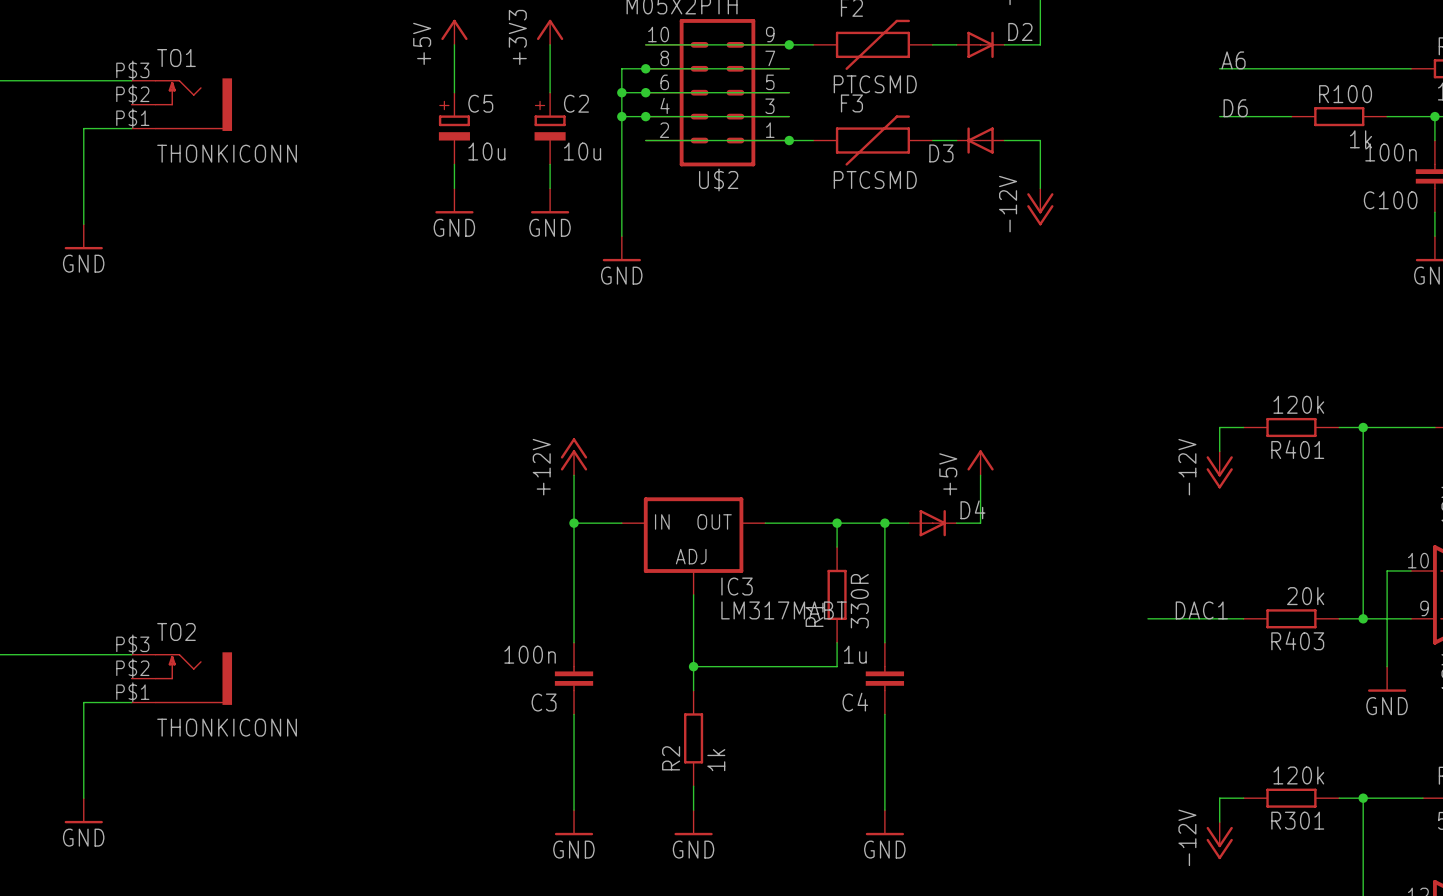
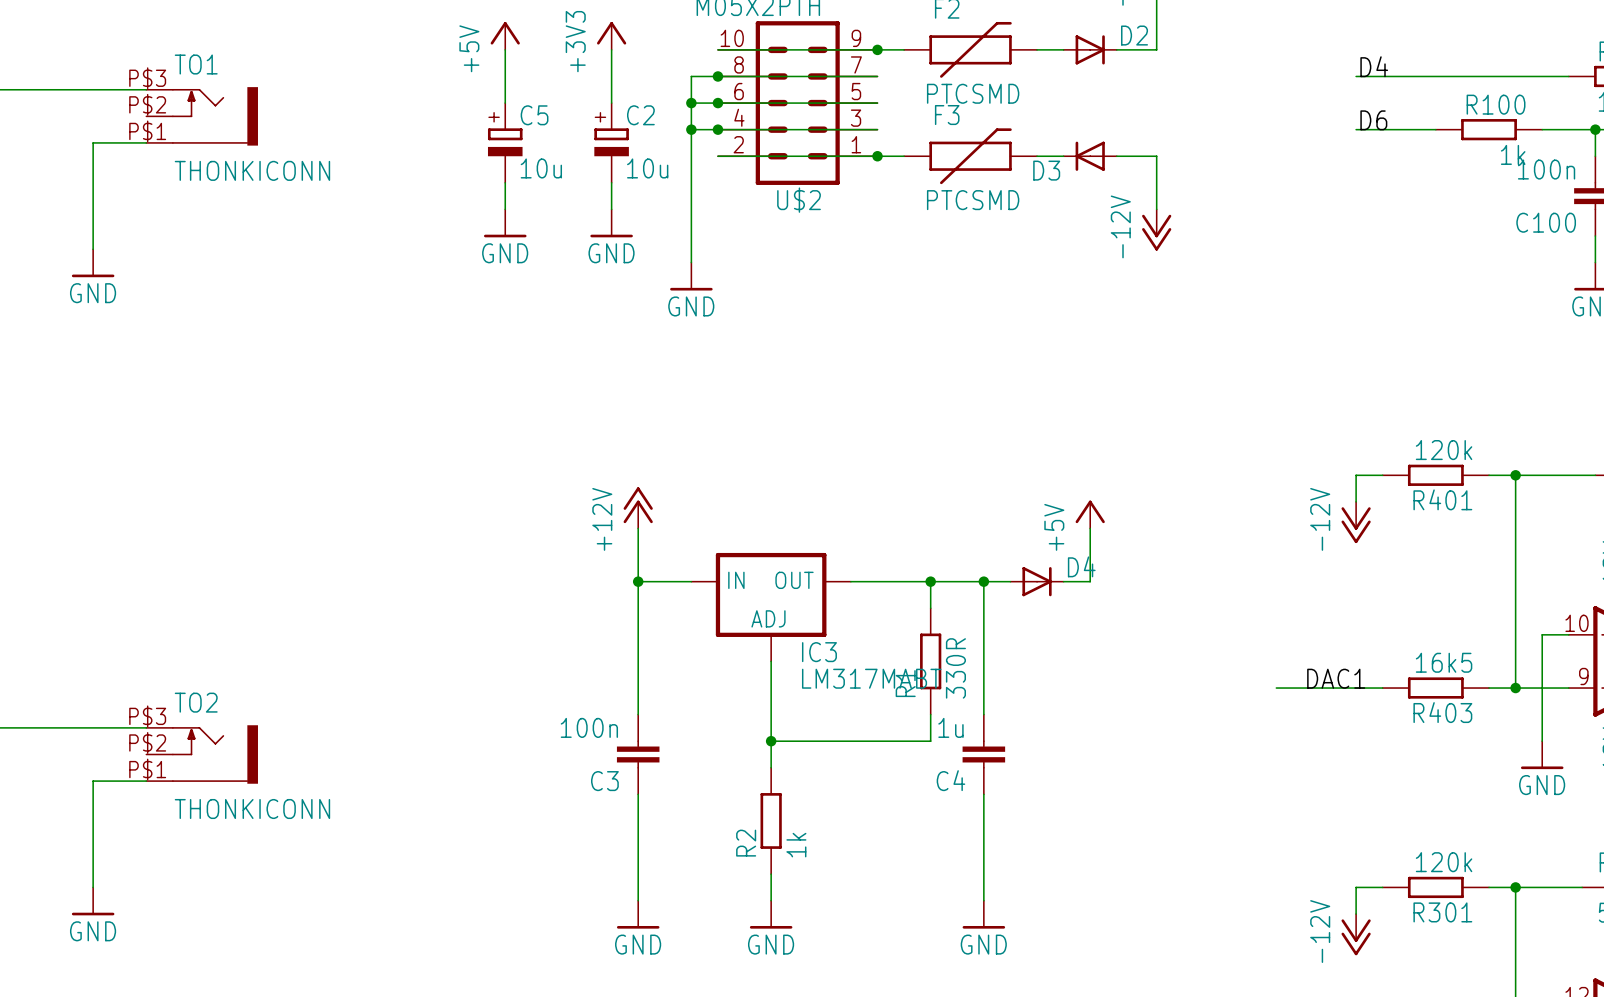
label: A6 (1233, 60) -> D4 (1374, 66)
R403 value: 20k (1305, 596) -> 16k5 (1444, 662)

